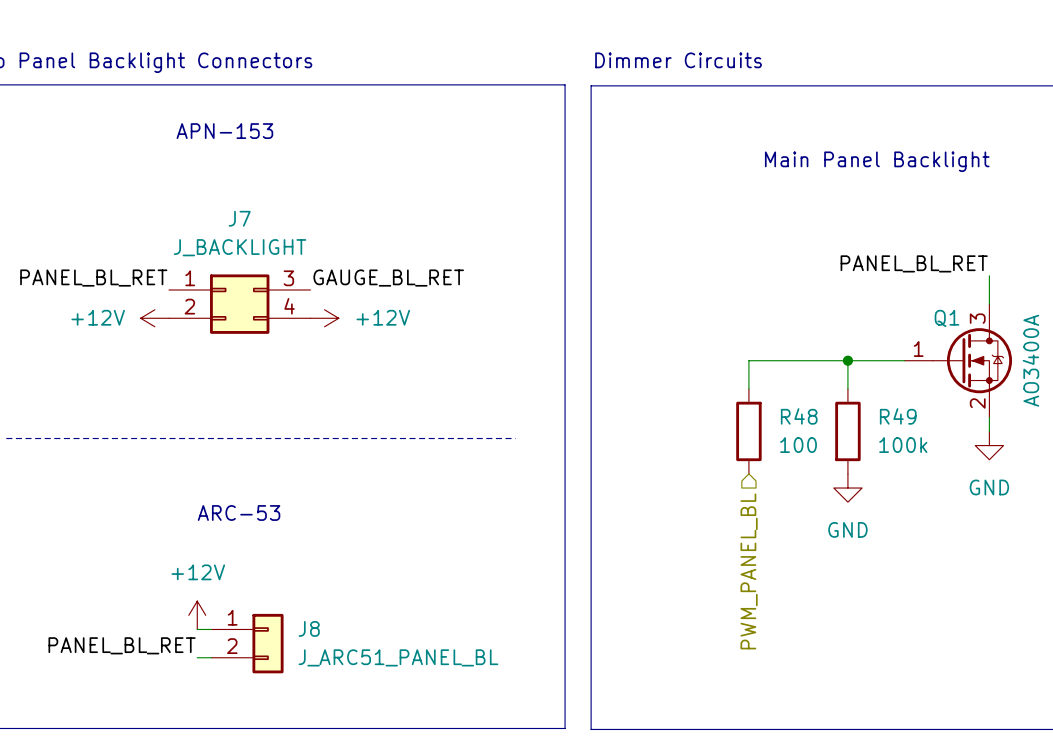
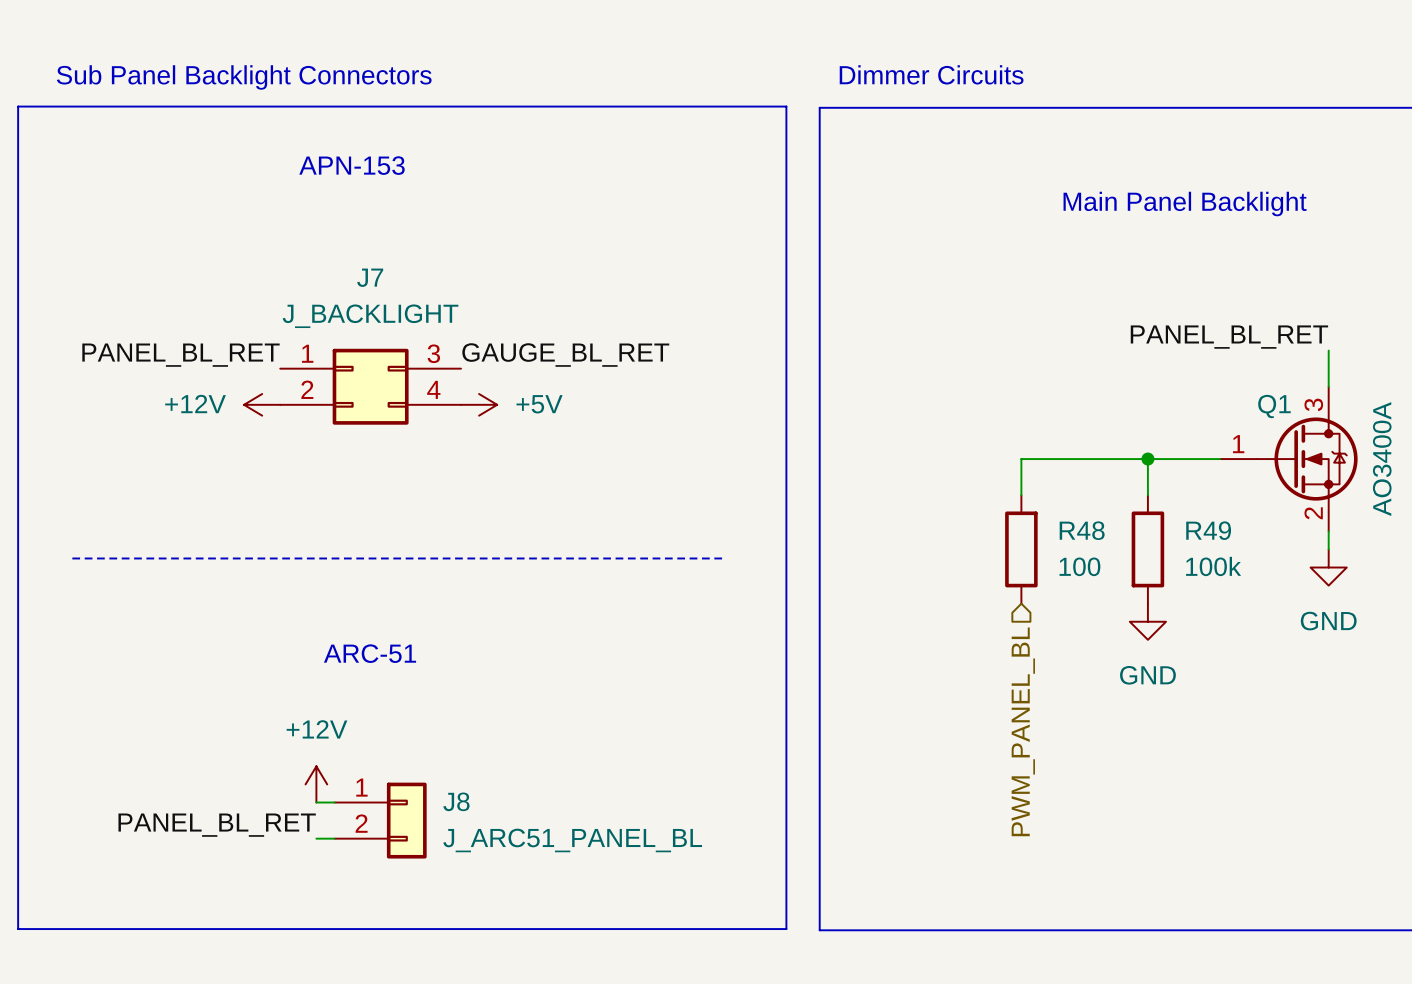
power symbol: +12V (324, 318) -> +5V (479, 404)
text: ARC-53 (239, 512) -> ARC-51 (370, 653)

